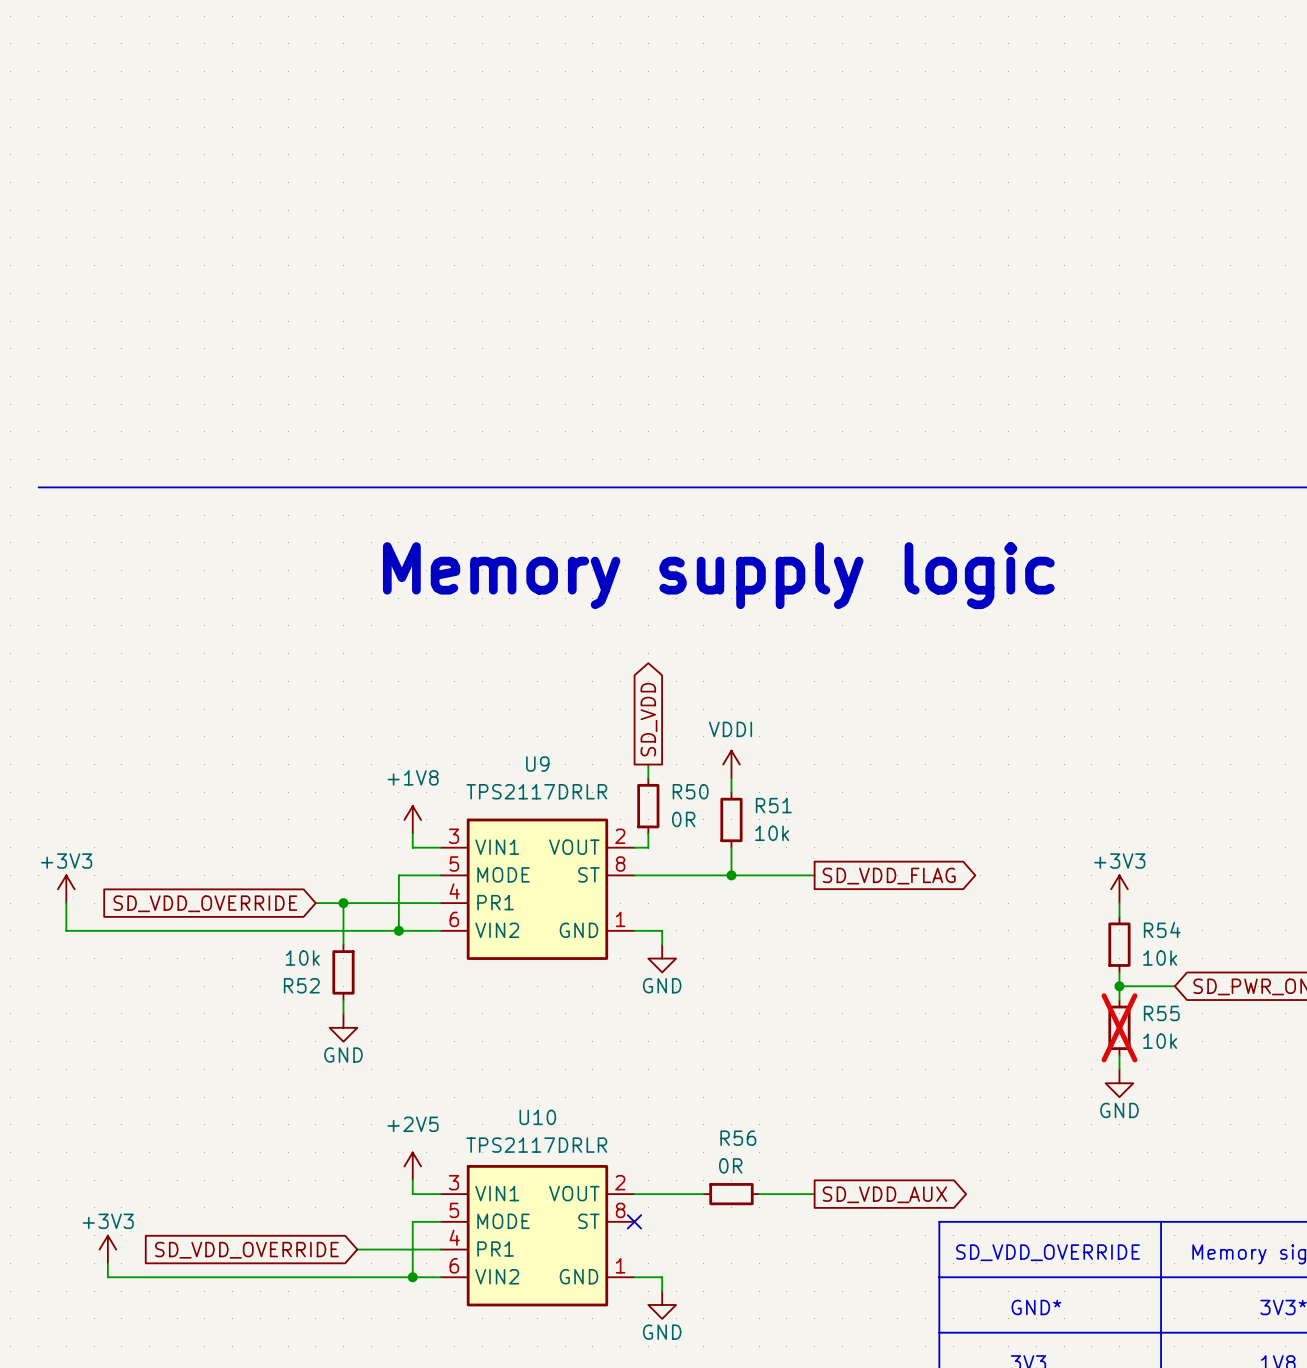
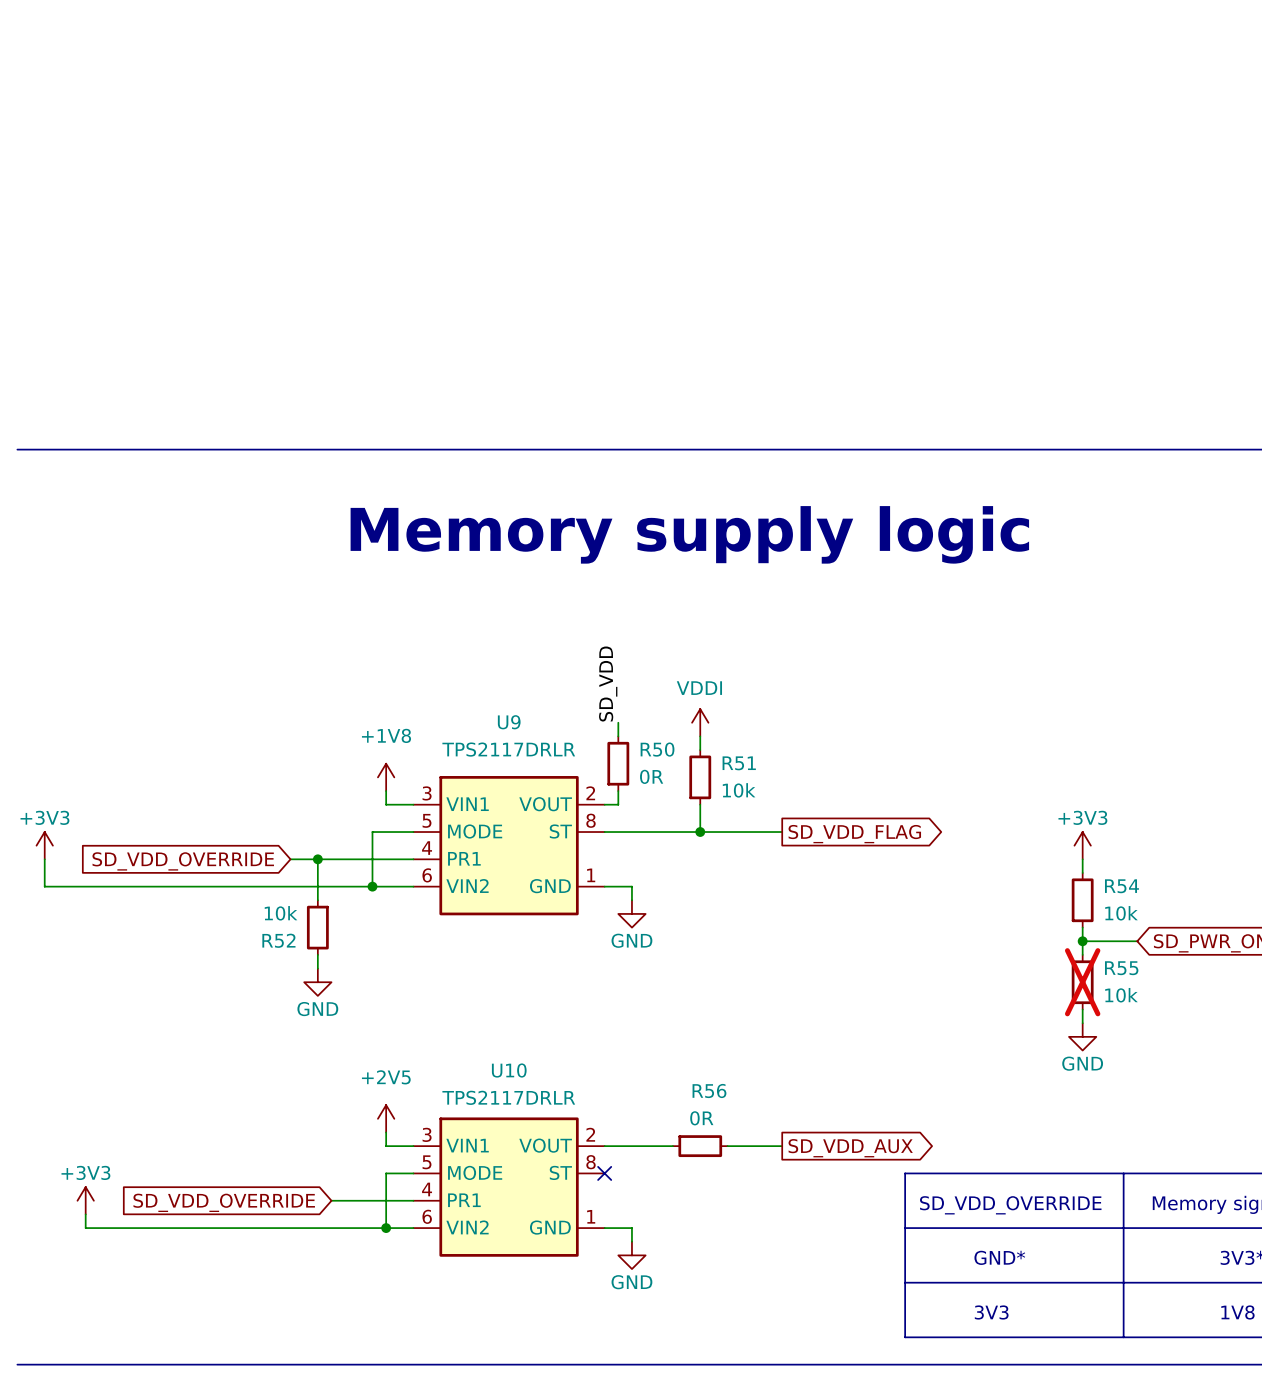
global label: SD_VDD (648, 719) -> none
label: none -> SD_VDD (608, 684)

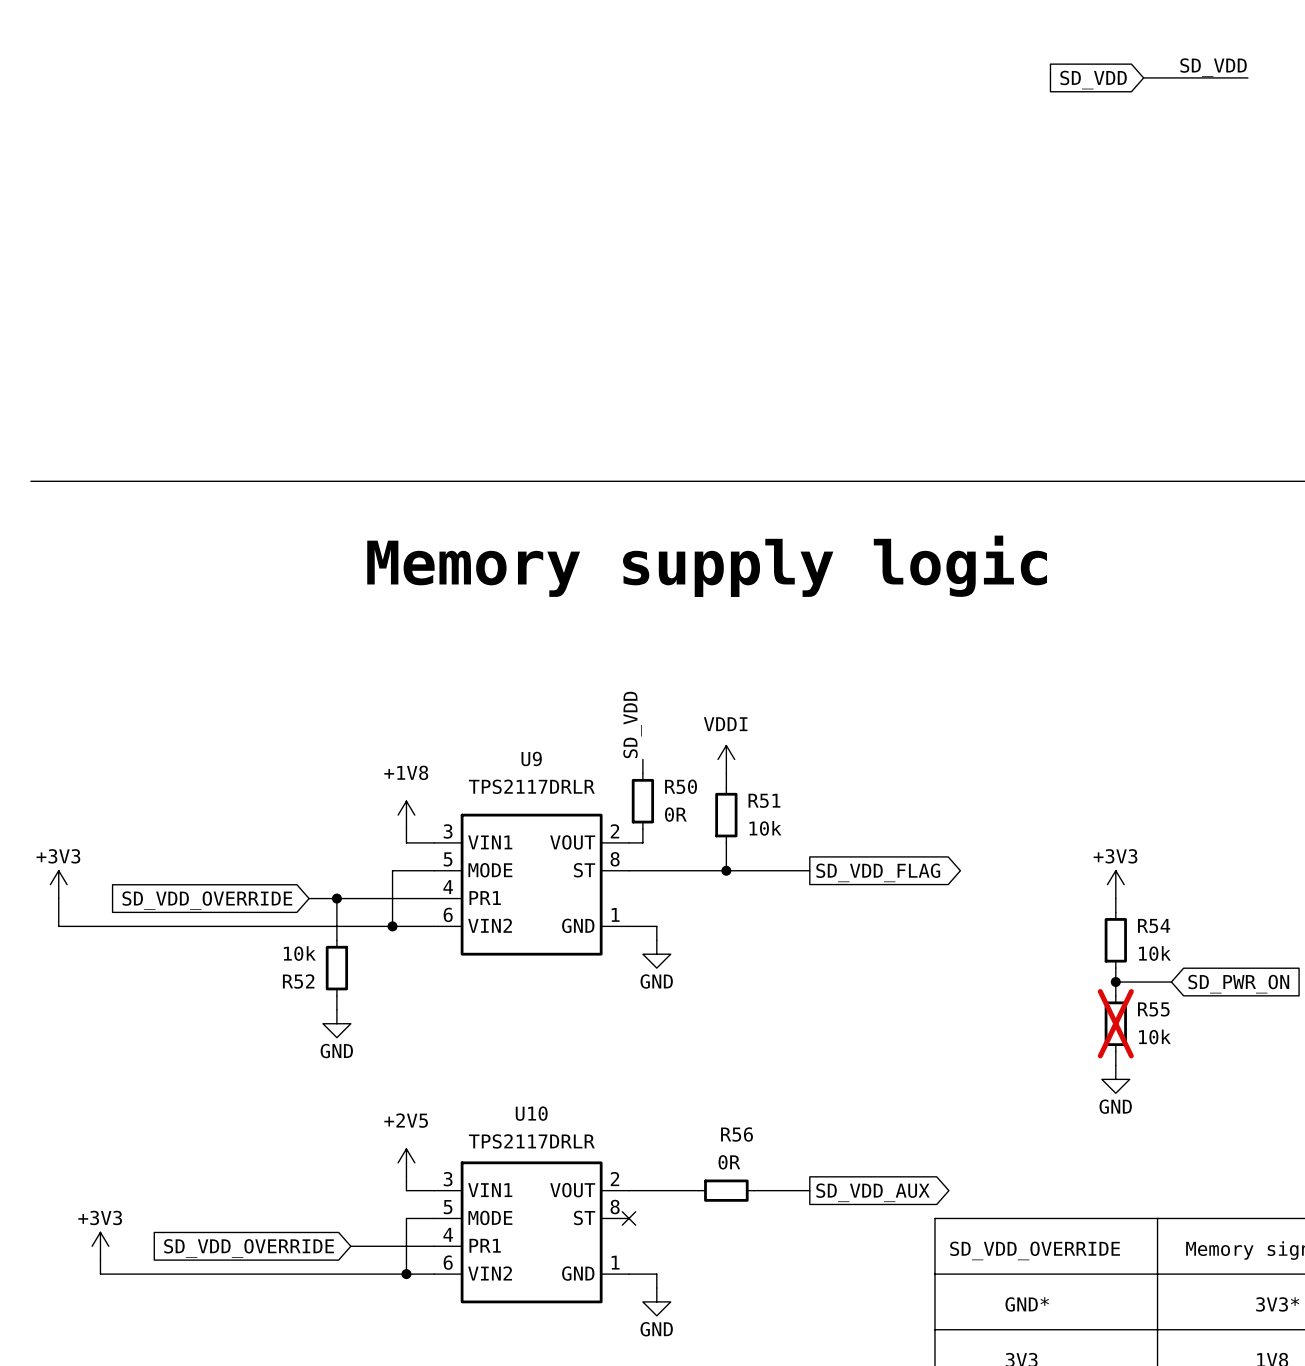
label: none -> SD_VDD (1213, 67)
wire: none -> (1143, 77) (1247, 77)
global label: none -> SD_VDD (1093, 80)

